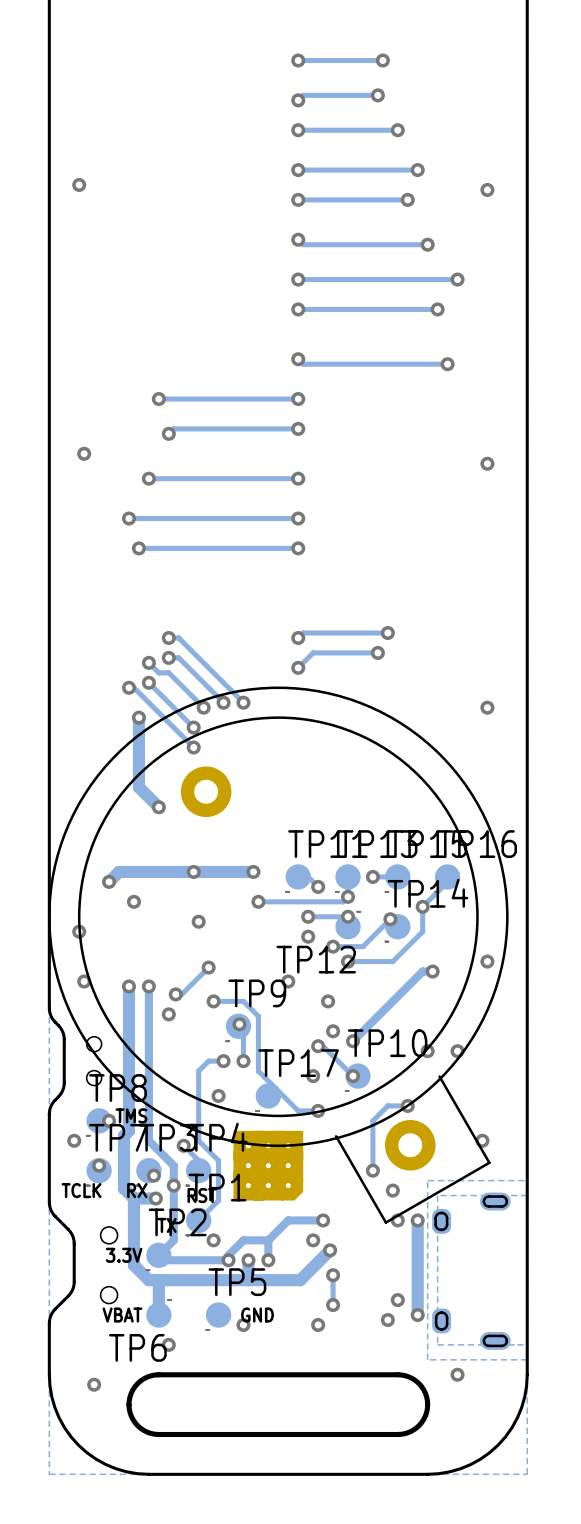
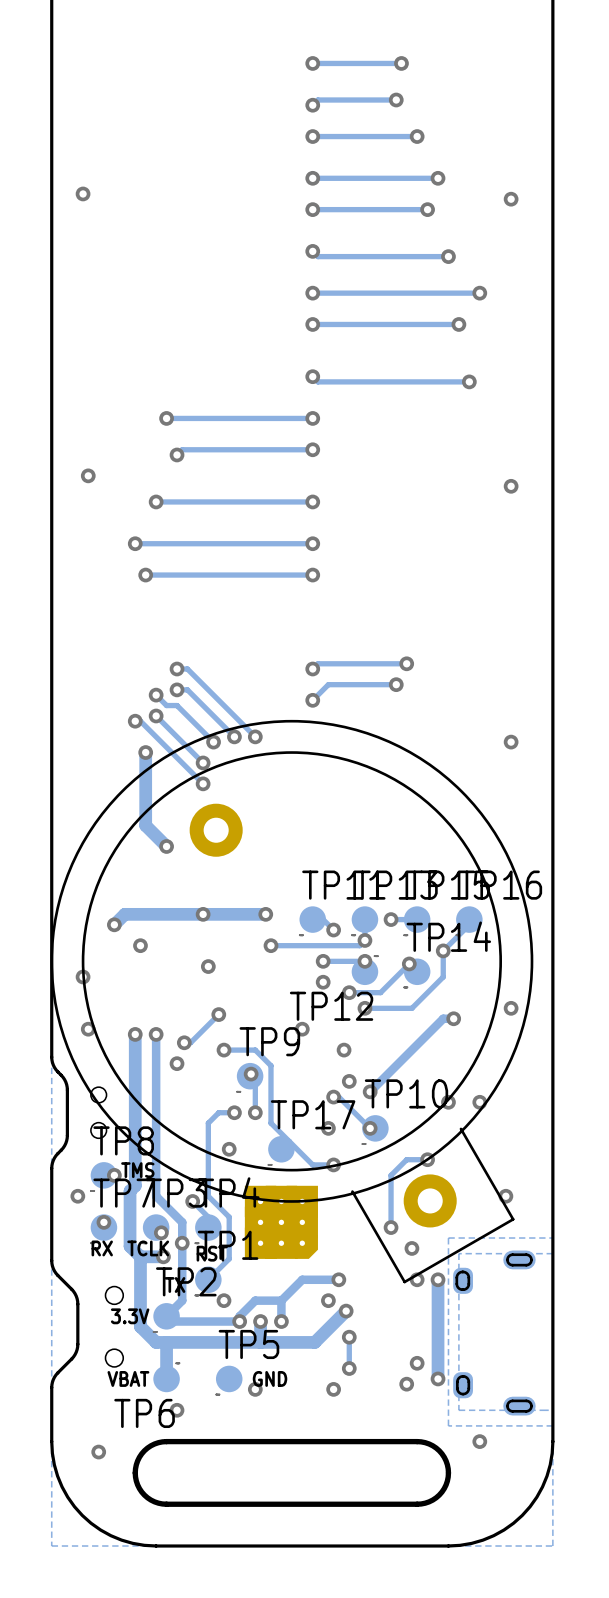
text position: TCLK (81, 1190) -> TCLK (148, 1248)
text position: RX (137, 1190) -> RX (102, 1248)

